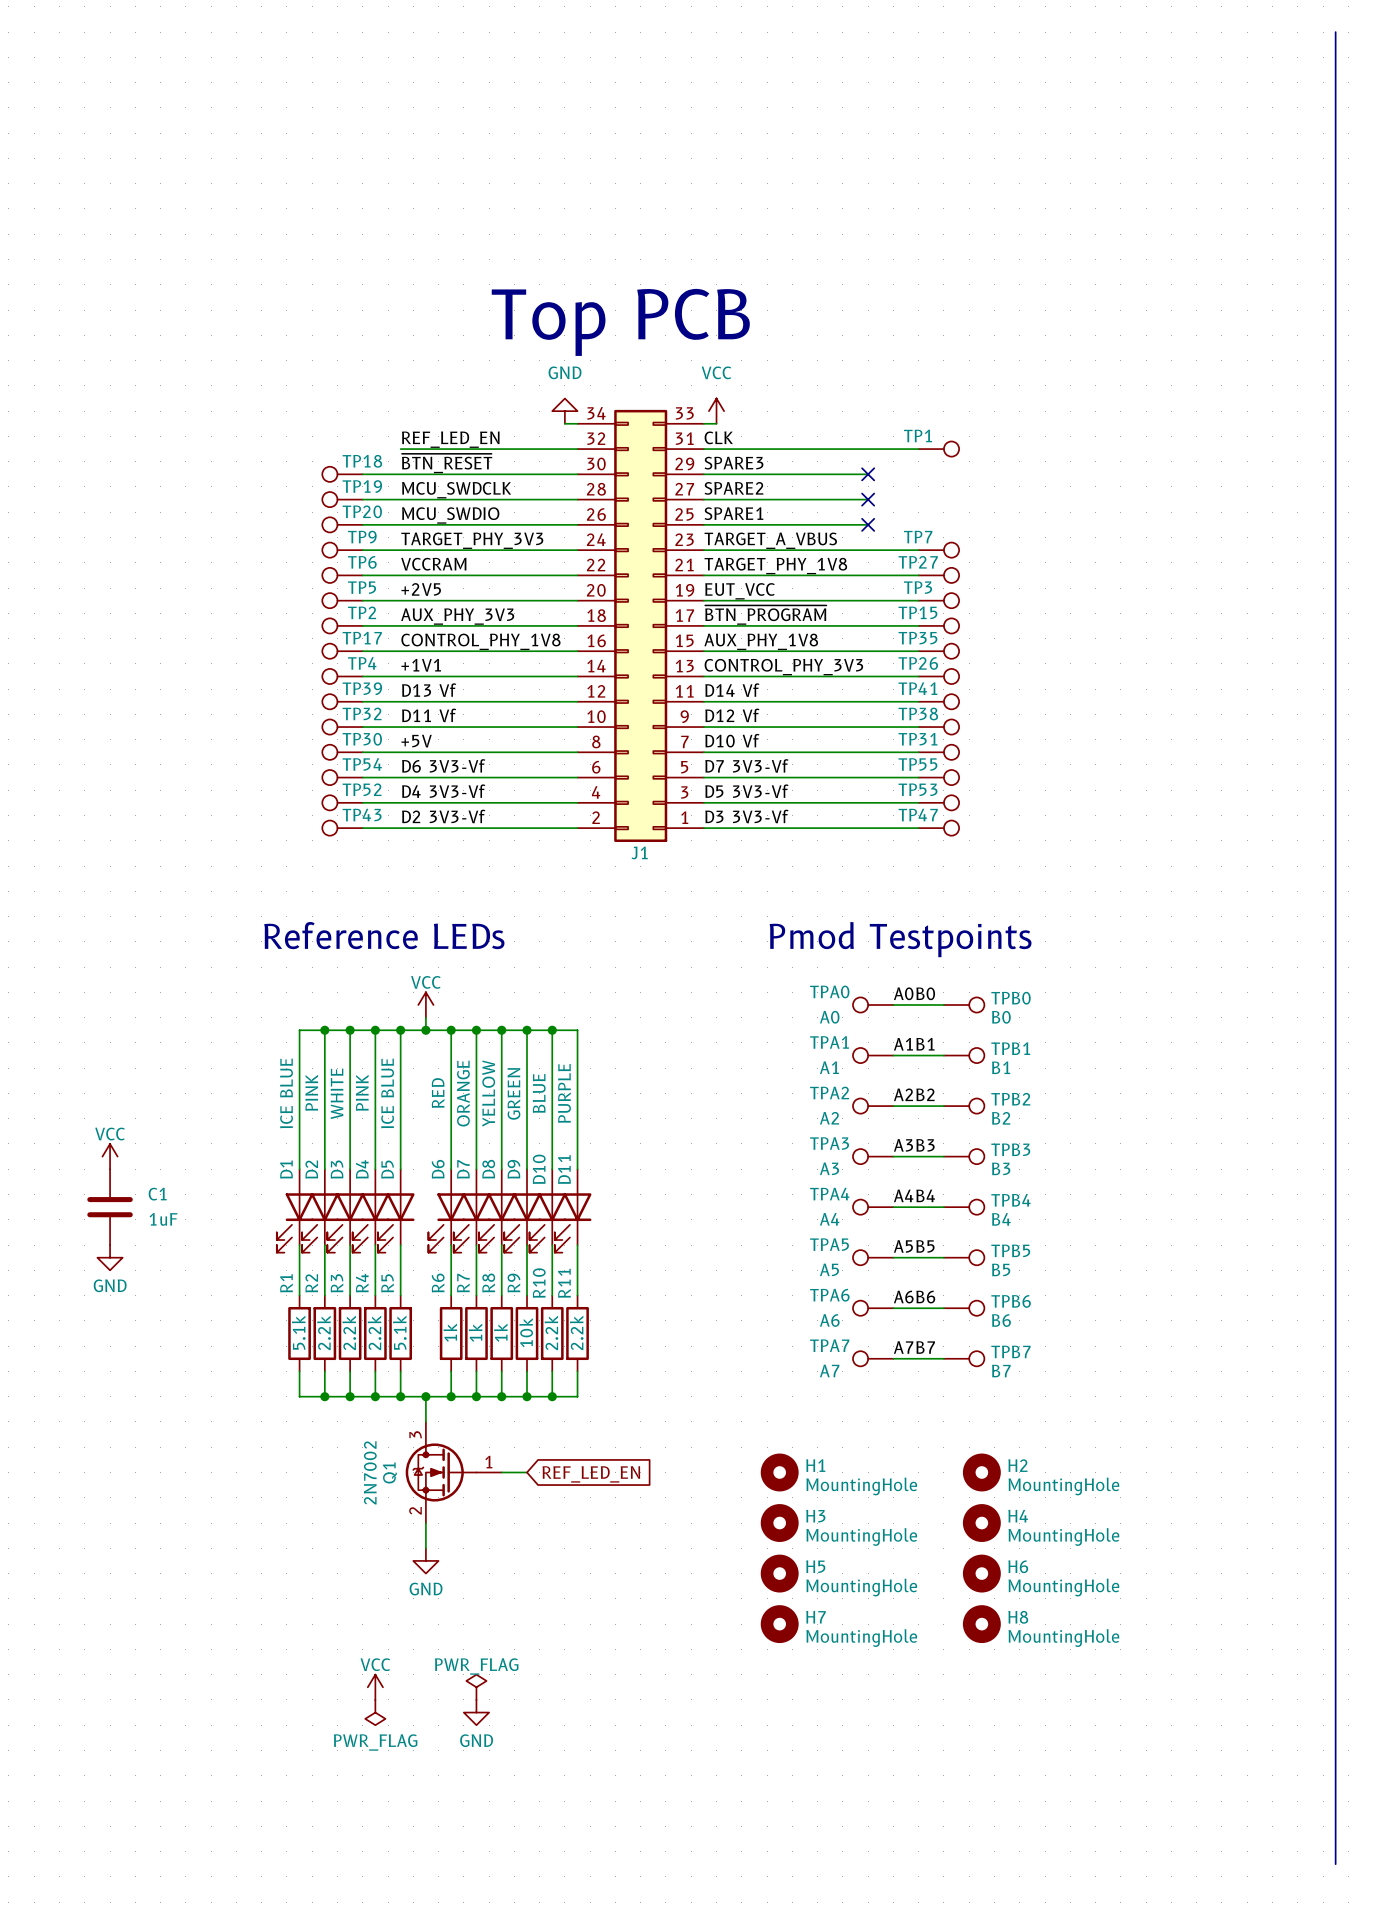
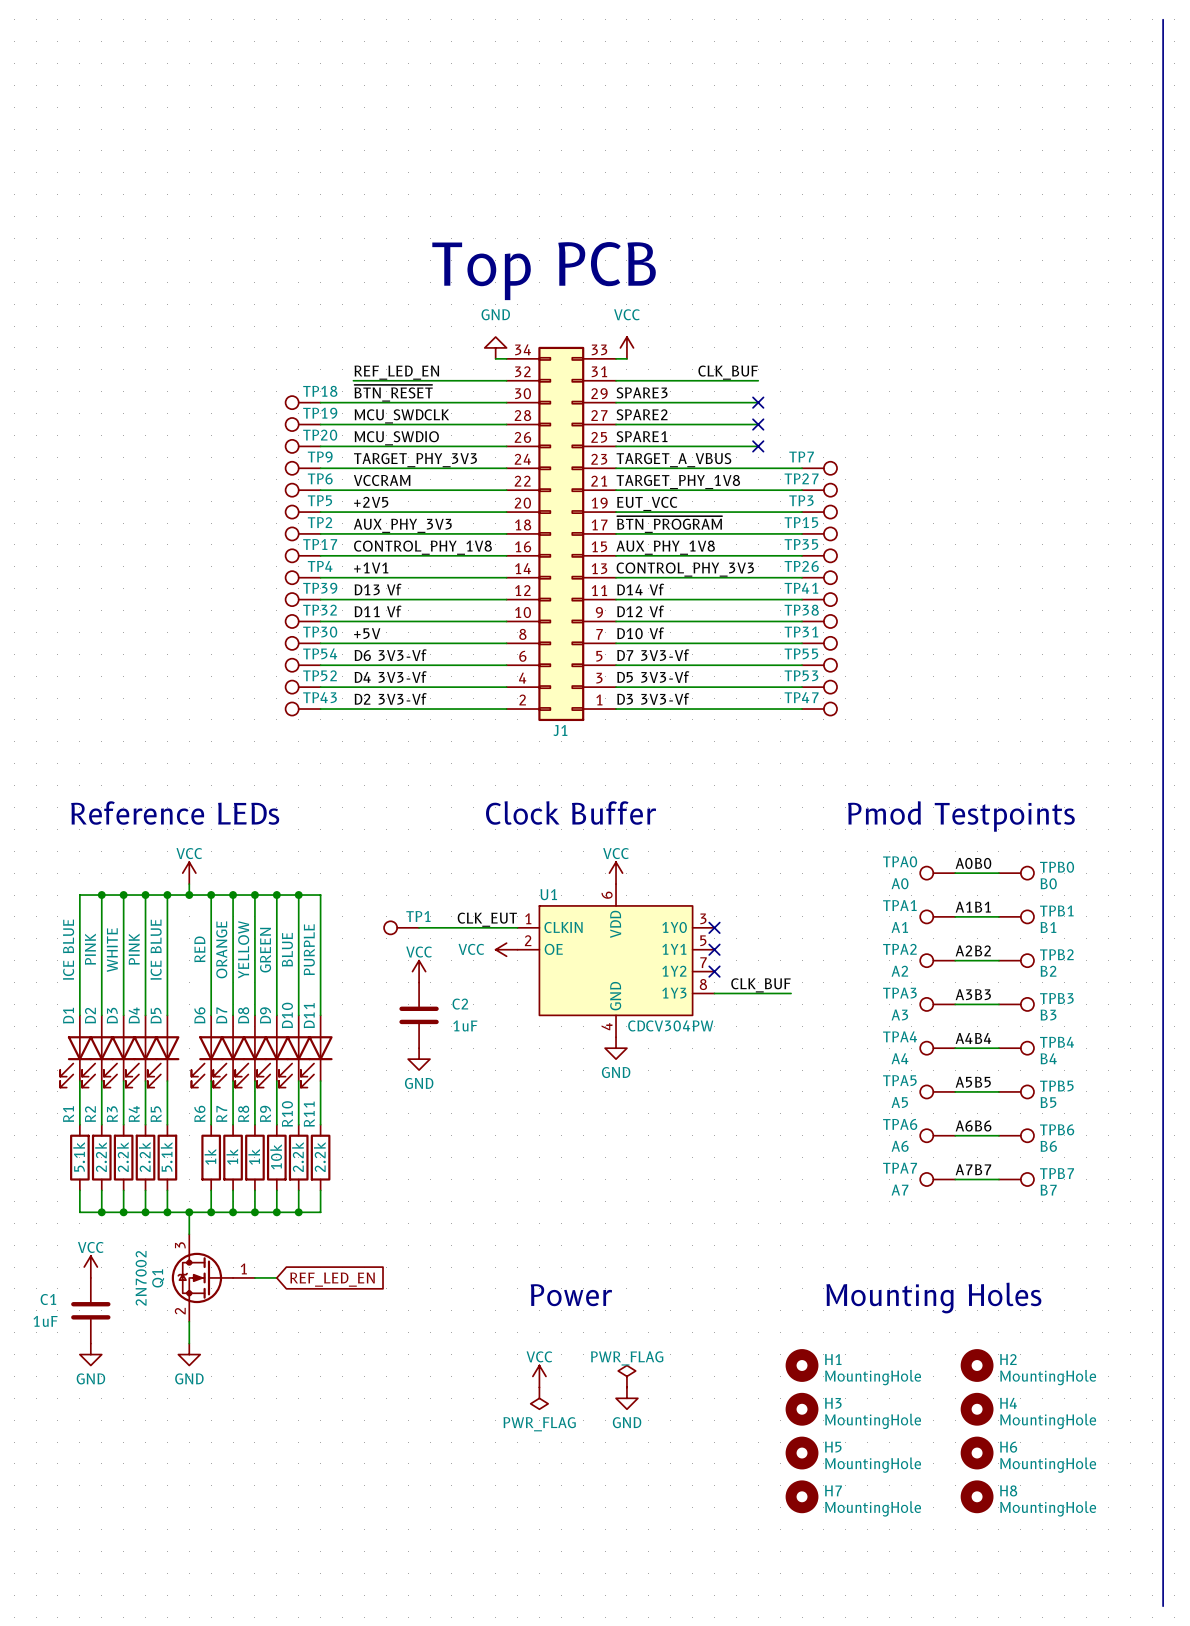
TP1 name position: TP1 (917, 435) -> TP1 (418, 916)
label: CLK (718, 437) -> none
label: none -> CLK_BUF (728, 372)
wire: (868, 449) (918, 449) -> none
TP1 position: (938, 449) -> (401, 927)
TP1 rotation: 0° (951, 449) -> 180° (390, 927)
text position: Reference LEDs (384, 935) -> Reference LEDs (175, 813)
text position: Pmod Testpoints (900, 939) -> Pmod Testpoints (961, 816)
text: none -> Clock Buffer (571, 812)
label position: A0B0 (914, 993) -> A0B0 (973, 863)
power symbol: VCC (425, 1004) -> none
TPA0 position: (873, 1004) -> (937, 873)
wire: (893, 1004) (943, 1004) -> (955, 873) (998, 873)
TPB0 position: (964, 1004) -> (1016, 873)
power symbol: none -> VCC (189, 873)
wire: (425, 1017) (425, 1030) -> (189, 884) (189, 895)
power symbol: none -> VCC (616, 873)
wire: (324, 1030) (324, 1169) -> (101, 895) (101, 1015)
junction: (324, 1030) -> none
wire: (350, 1030) (350, 1169) -> (123, 895) (123, 1015)
junction: (350, 1030) -> none
wire: (375, 1030) (375, 1169) -> (145, 895) (145, 1015)
junction: (375, 1030) -> none
wire: (400, 1030) (400, 1169) -> (167, 895) (167, 1015)
junction: (400, 1030) -> none
junction: (425, 1030) -> none
wire: (451, 1030) (451, 1169) -> (211, 895) (211, 1015)
junction: (451, 1030) -> none
wire: (476, 1030) (476, 1169) -> (233, 895) (233, 1015)
junction: (476, 1030) -> none
wire: (501, 1030) (501, 1169) -> (254, 895) (254, 1015)
junction: (501, 1030) -> none
wire: (526, 1030) (526, 1169) -> (276, 895) (276, 1015)
junction: (526, 1030) -> none
wire: (552, 1030) (552, 1169) -> (298, 895) (298, 1015)
junction: (552, 1030) -> none
junction: none -> (101, 895)
junction: none -> (123, 895)
junction: none -> (145, 895)
junction: none -> (167, 895)
junction: none -> (189, 895)
junction: none -> (211, 895)
junction: none -> (233, 895)
junction: none -> (254, 895)
junction: none -> (276, 895)
junction: none -> (298, 895)
label position: A1B1 (914, 1044) -> A1B1 (973, 907)
TPA1 position: (873, 1055) -> (937, 916)
wire: (893, 1055) (943, 1055) -> (955, 916) (998, 916)
TPB1 position: (964, 1055) -> (1016, 916)
label: none -> CLK_EUT (487, 919)
wire: none -> (419, 927) (517, 927)
no-connect mark: none -> (714, 927)
label position: A2B2 (914, 1094) -> A2B2 (973, 950)
power symbol: none -> VCC (506, 949)
no-connect mark: none -> (714, 949)
TPA2 position: (873, 1106) -> (937, 960)
wire: (893, 1106) (943, 1106) -> (955, 960) (998, 960)
TPB2 position: (964, 1106) -> (1016, 960)
U1: none -> CDCV304PW (616, 960)
power symbol: none -> VCC (419, 971)
no-connect mark: none -> (714, 971)
label position: A3B3 (914, 1145) -> A3B3 (973, 994)
label: none -> CLK_BUF (760, 985)
power symbol: VCC (110, 1156) -> none
wire: none -> (714, 993) (780, 993)
TPA3 position: (873, 1156) -> (937, 1004)
wire: (906, 1156) (943, 1156) -> none
TPB3 position: (964, 1156) -> (1016, 1004)
wire: (299, 1169) (299, 1030) (577, 1030) (577, 1169) -> (79, 1015) (79, 895) (320, 895) (320, 1015)
wire: none -> (955, 1004) (998, 1004)
C2: none -> 1uF (419, 1015)
C1 name position: C1 (157, 1194) -> C1 (48, 1299)
label position: A4B4 (914, 1195) -> A4B4 (973, 1038)
C1 position: (110, 1207) -> (90, 1310)
TPA4 position: (873, 1207) -> (937, 1048)
wire: (893, 1207) (943, 1207) -> (955, 1048) (998, 1048)
TPB4 position: (964, 1207) -> (1016, 1048)
D1 position: (295, 1210) -> (76, 1051)
D2 position: (320, 1210) -> (97, 1051)
D3 position: (345, 1210) -> (119, 1051)
D4 position: (370, 1210) -> (141, 1051)
D5 position: (396, 1210) -> (163, 1051)
D6 position: (446, 1210) -> (207, 1051)
D7 position: (472, 1210) -> (229, 1051)
D8 position: (497, 1210) -> (251, 1051)
D9 position: (522, 1210) -> (272, 1051)
D10 position: (547, 1210) -> (294, 1051)
D11 position: (573, 1210) -> (316, 1051)
C1 value position: 1uF (163, 1219) -> 1uF (45, 1321)
power symbol: none -> GND (616, 1048)
power symbol: none -> GND (419, 1059)
wire: (299, 1245) (299, 1295) -> (79, 1081) (79, 1124)
wire: (324, 1245) (324, 1295) -> (101, 1081) (101, 1124)
wire: (350, 1245) (350, 1295) -> (123, 1081) (123, 1124)
wire: (375, 1245) (375, 1295) -> (145, 1081) (145, 1124)
wire: (400, 1245) (400, 1295) -> (167, 1081) (167, 1124)
wire: (451, 1245) (451, 1295) -> (211, 1081) (211, 1124)
wire: (476, 1245) (476, 1295) -> (233, 1081) (233, 1124)
wire: (501, 1245) (501, 1295) -> (254, 1081) (254, 1124)
wire: (526, 1245) (526, 1295) -> (276, 1081) (276, 1124)
wire: (552, 1245) (552, 1295) -> (298, 1081) (298, 1124)
wire: (577, 1245) (577, 1295) -> (320, 1081) (320, 1124)
label position: A5B5 (914, 1246) -> A5B5 (973, 1082)
power symbol: GND (110, 1257) -> none
TPA5 position: (873, 1257) -> (937, 1091)
wire: (893, 1257) (943, 1257) -> (955, 1091) (998, 1091)
TPB5 position: (964, 1257) -> (1016, 1091)
label position: A6B6 (914, 1297) -> A6B6 (973, 1126)
TPA6 position: (873, 1308) -> (937, 1135)
wire: (893, 1308) (943, 1308) -> (955, 1135) (998, 1135)
TPB6 position: (964, 1308) -> (1016, 1135)
R1 position: (299, 1333) -> (79, 1157)
R2 position: (324, 1333) -> (101, 1157)
R3 position: (350, 1333) -> (123, 1157)
R4 position: (375, 1333) -> (145, 1157)
R5 position: (400, 1333) -> (167, 1157)
R6 position: (451, 1333) -> (211, 1157)
R7 position: (476, 1333) -> (233, 1157)
R8 position: (501, 1333) -> (254, 1157)
R9 position: (526, 1333) -> (276, 1157)
R10 position: (552, 1333) -> (298, 1157)
R11 position: (577, 1333) -> (320, 1157)
label position: A7B7 (914, 1347) -> A7B7 (973, 1169)
TPA7 position: (873, 1358) -> (937, 1179)
wire: (893, 1358) (943, 1358) -> (955, 1179) (998, 1179)
TPB7 position: (964, 1358) -> (1016, 1179)
wire: (299, 1371) (299, 1396) (577, 1396) (577, 1371) -> (79, 1190) (79, 1212) (320, 1212) (320, 1190)
wire: (324, 1371) (324, 1396) -> (101, 1190) (101, 1212)
wire: (350, 1371) (350, 1396) -> (123, 1190) (123, 1212)
wire: (375, 1371) (375, 1396) -> (145, 1190) (145, 1212)
wire: (400, 1371) (400, 1396) -> (167, 1190) (167, 1212)
wire: (451, 1371) (451, 1396) -> (211, 1190) (211, 1212)
wire: (476, 1371) (476, 1396) -> (233, 1190) (233, 1212)
wire: (501, 1371) (501, 1396) -> (254, 1190) (254, 1212)
wire: (526, 1371) (526, 1396) -> (276, 1190) (276, 1212)
wire: (552, 1371) (552, 1396) -> (298, 1190) (298, 1212)
junction: (324, 1396) -> none
junction: (350, 1396) -> none
junction: (375, 1396) -> none
junction: (400, 1396) -> none
wire: (425, 1396) (425, 1421) -> (189, 1212) (189, 1234)
junction: (425, 1396) -> none
junction: (451, 1396) -> none
junction: (476, 1396) -> none
junction: (501, 1396) -> none
junction: (526, 1396) -> none
junction: (552, 1396) -> none
junction: none -> (101, 1212)
junction: none -> (123, 1212)
junction: none -> (145, 1212)
junction: none -> (167, 1212)
junction: none -> (189, 1212)
junction: none -> (211, 1212)
junction: none -> (233, 1212)
junction: none -> (254, 1212)
junction: none -> (276, 1212)
junction: none -> (298, 1212)
power symbol: none -> VCC (90, 1267)
Q1 position: (453, 1472) -> (213, 1277)
wire: (501, 1472) (526, 1472) -> (254, 1277) (276, 1277)
H1 position: (779, 1472) -> (802, 1365)
H2 position: (981, 1472) -> (977, 1365)
global label position: REF_LED_EN (591, 1474) -> REF_LED_EN (332, 1279)
text: none -> Power (571, 1295)
text: none -> Mounting Holes (933, 1298)
wire: (425, 1523) (425, 1548) -> (189, 1321) (189, 1343)
H3 position: (779, 1523) -> (802, 1409)
H4 position: (981, 1523) -> (977, 1409)
power symbol: GND (425, 1560) -> none
power symbol: none -> GND (90, 1354)
power symbol: none -> GND (189, 1354)
H5 position: (779, 1573) -> (802, 1453)
H6 position: (981, 1573) -> (977, 1453)
power symbol: none -> VCC (539, 1376)
power symbol: none -> PWR_FLAG (626, 1376)
power symbol: none -> PWR_FLAG (539, 1398)
power symbol: none -> GND (626, 1398)
H7 position: (779, 1624) -> (802, 1496)
H8 position: (981, 1624) -> (977, 1496)
power symbol: VCC (375, 1687) -> none
power symbol: PWR_FLAG (476, 1687) -> none
power symbol: PWR_FLAG (375, 1712) -> none
power symbol: GND (476, 1712) -> none

